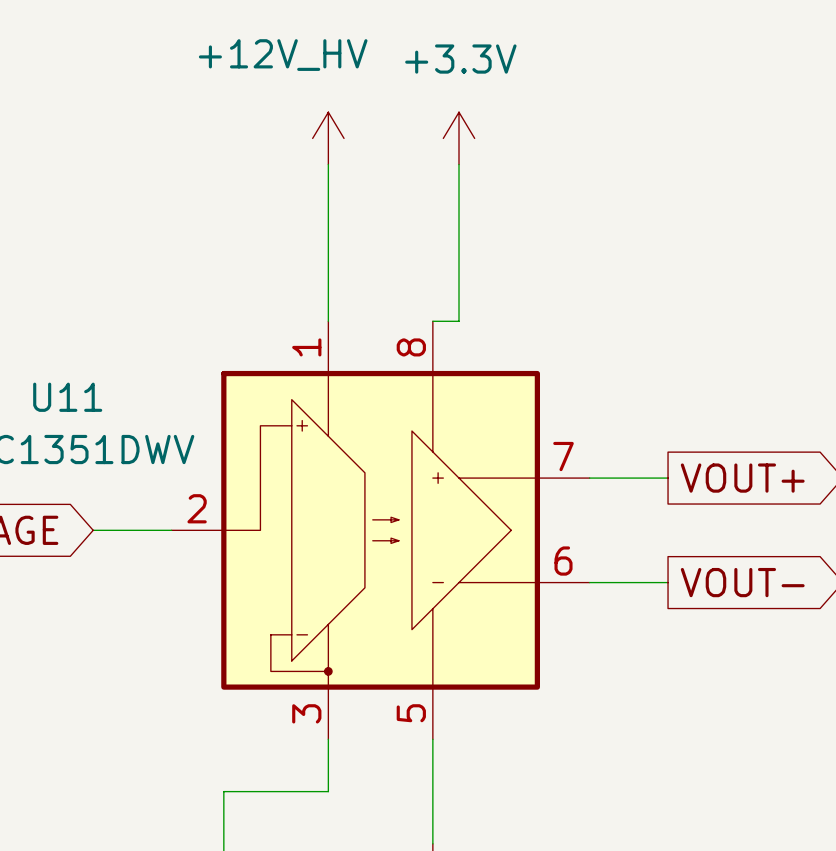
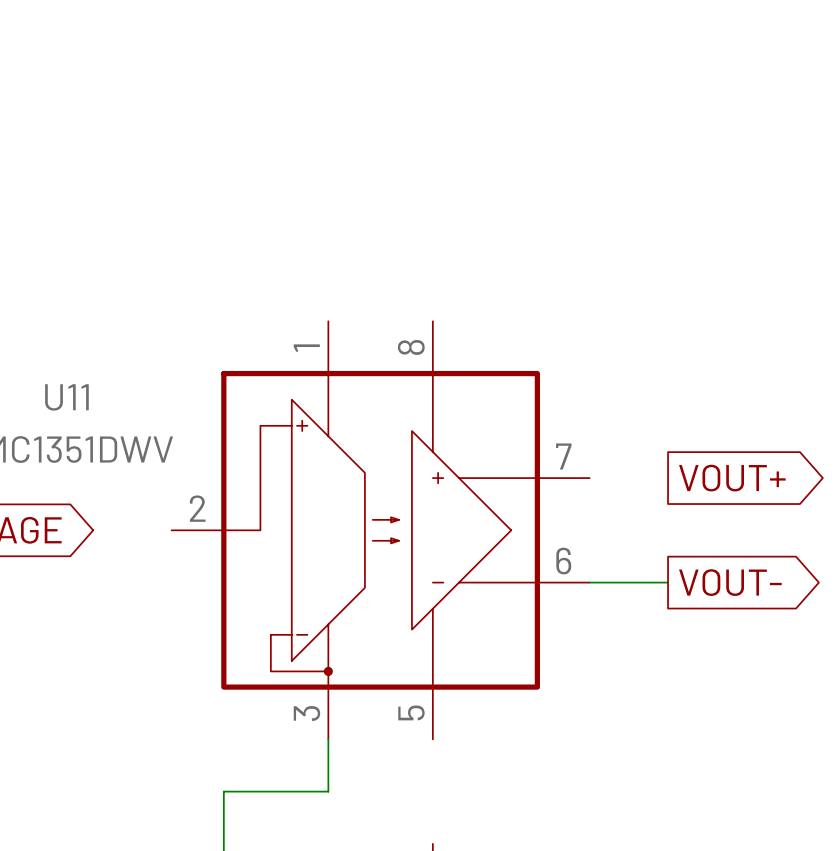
power symbol: +12V_HV (328, 138) -> none
power symbol: +3.3V (459, 138) -> none
wire: (328, 164) (328, 321) -> none
wire: (459, 164) (459, 321) (432, 321) -> none
wire: (589, 478) (668, 478) -> none
wire: (93, 530) (171, 530) -> none
wire: (432, 739) (432, 843) -> none

